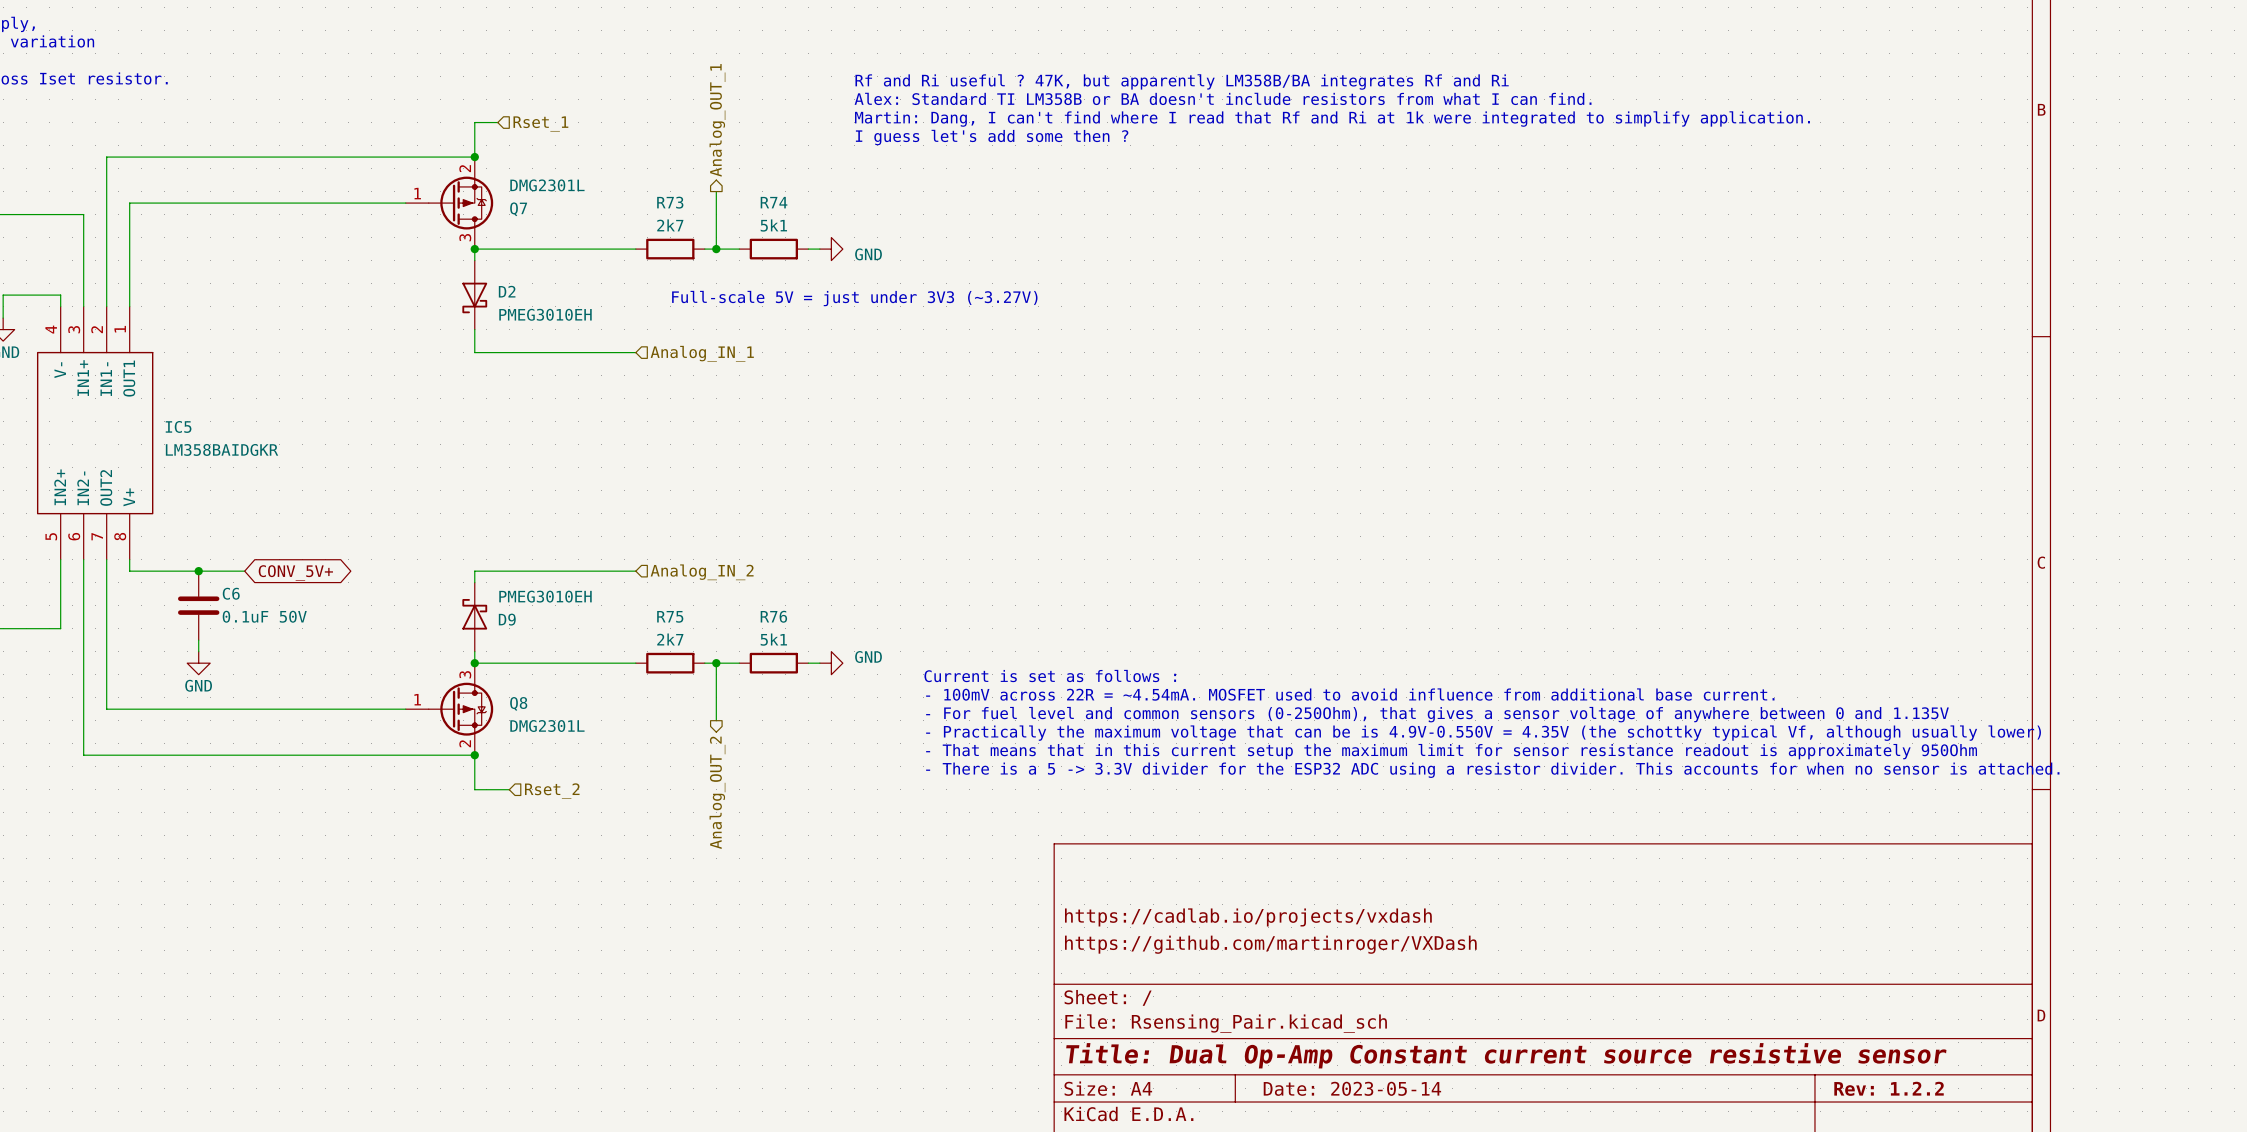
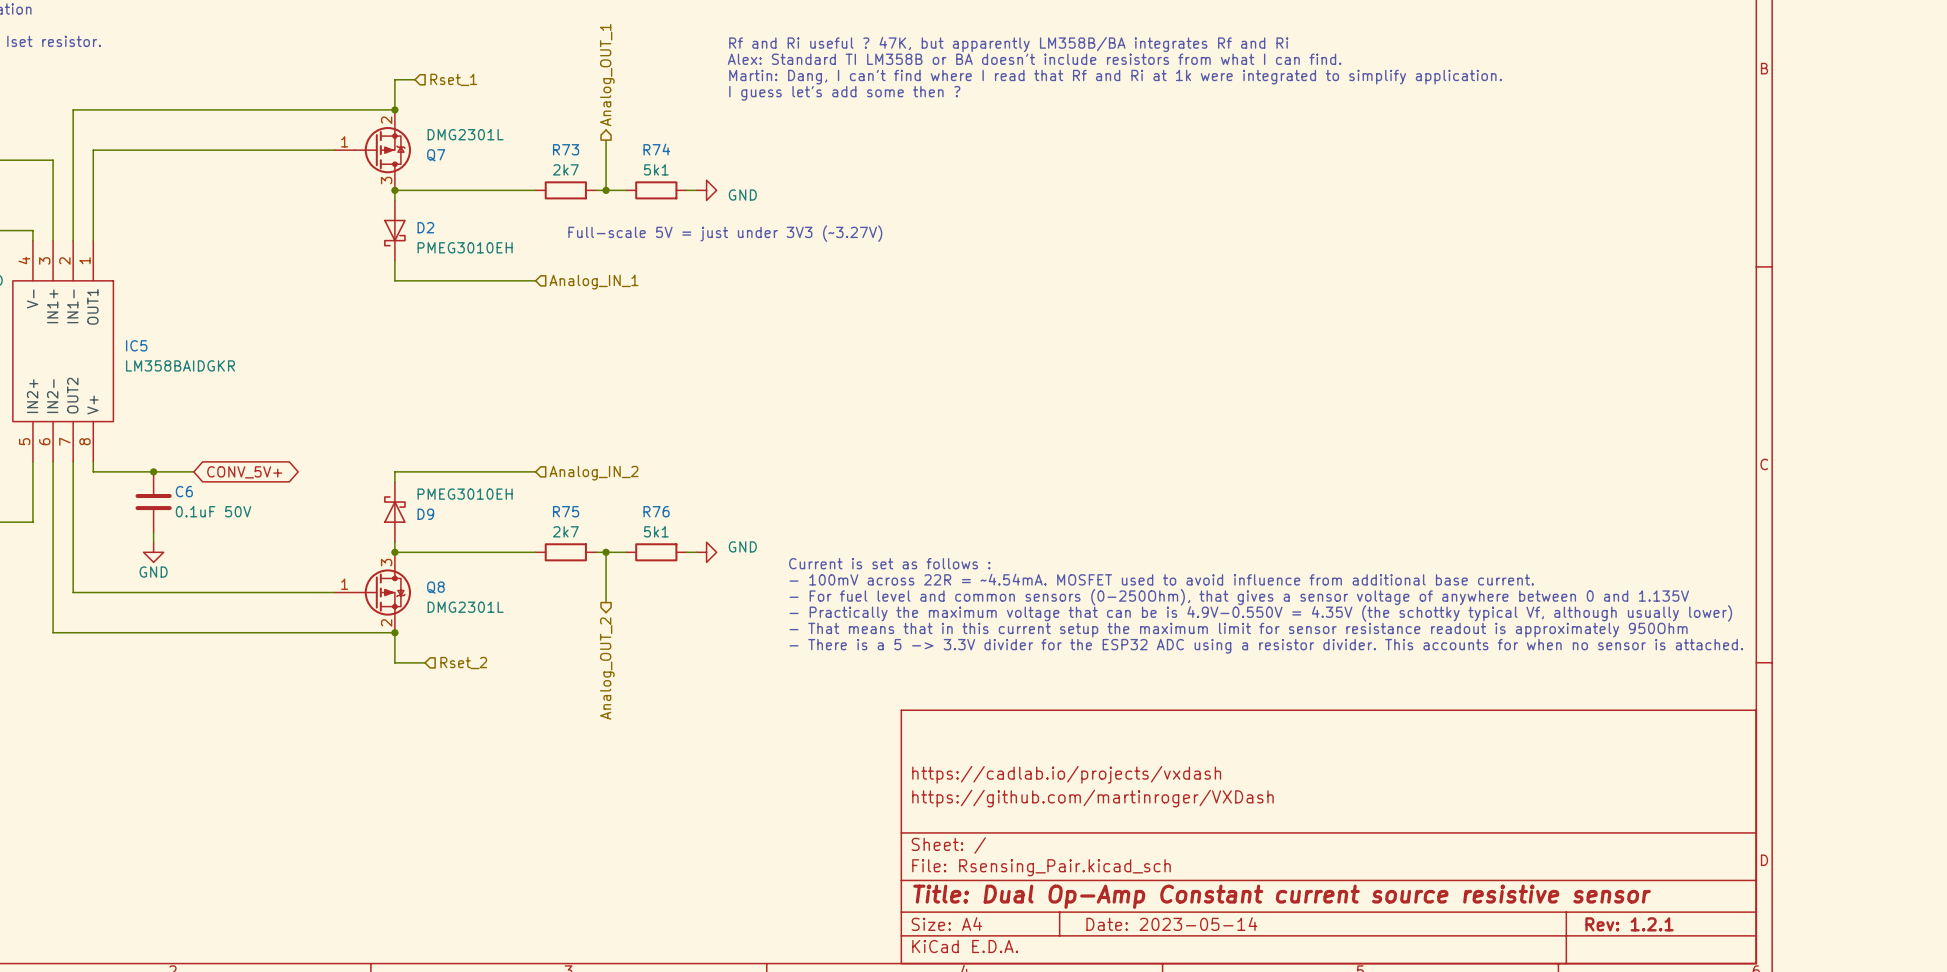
title block: Rev: 1.2.2 (1889, 1088) -> Rev: 1.2.1 (1629, 924)

